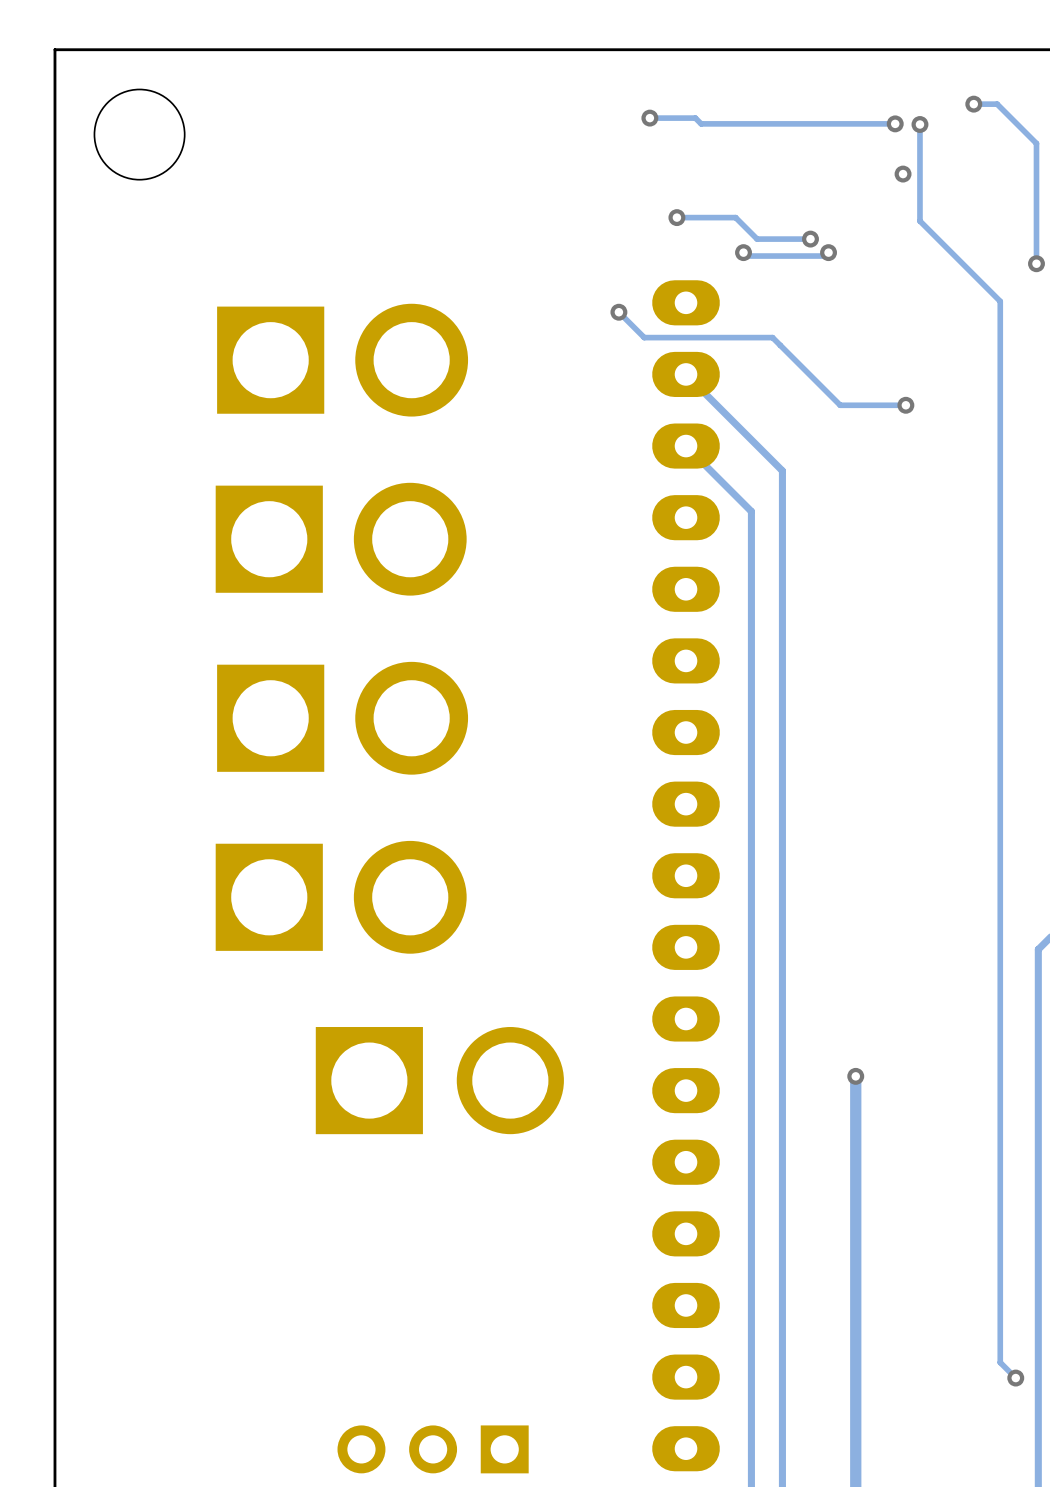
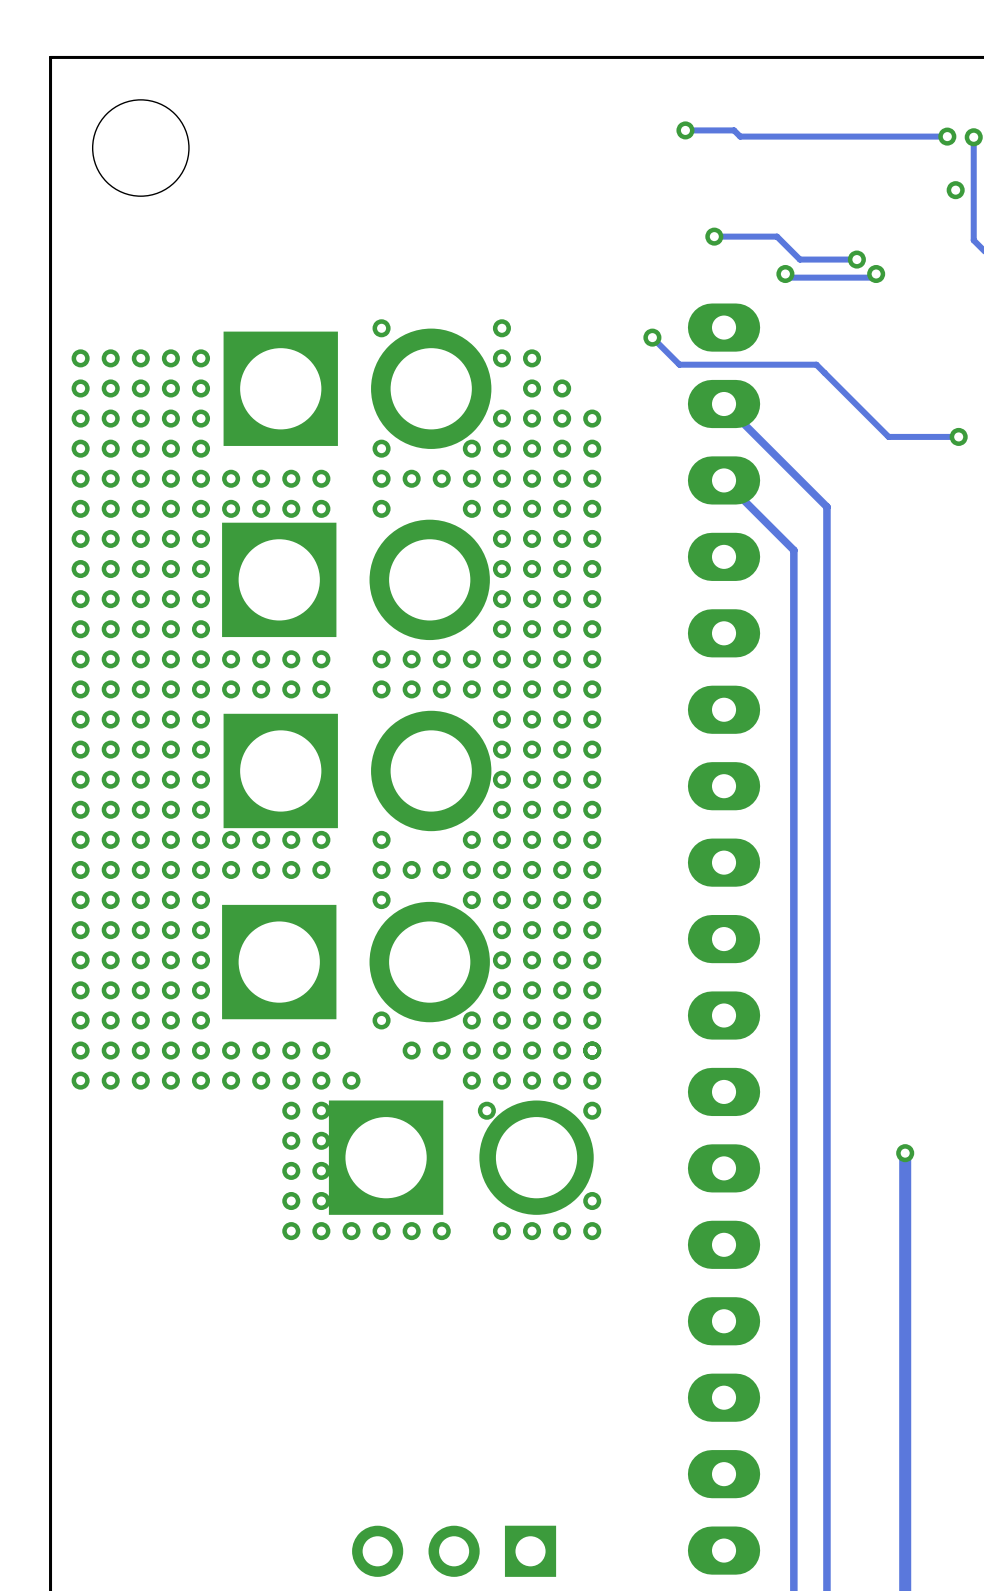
via: none -> (381, 328)
via: none -> (501, 328)
via: none -> (80, 358)
via: none -> (110, 358)
via: none -> (140, 358)
via: none -> (170, 358)
via: none -> (201, 358)
via: none -> (501, 358)
via: none -> (532, 358)
via: none -> (80, 388)
via: none -> (110, 388)
via: none -> (140, 388)
via: none -> (170, 388)
via: none -> (201, 388)
via: none -> (532, 388)
via: none -> (562, 388)
via: none -> (80, 418)
via: none -> (110, 418)
via: none -> (140, 418)
via: none -> (170, 418)
via: none -> (201, 418)
via: none -> (501, 418)
via: none -> (532, 418)
via: none -> (562, 418)
via: none -> (592, 418)
via: none -> (80, 448)
via: none -> (110, 448)
via: none -> (140, 448)
via: none -> (170, 448)
via: none -> (201, 448)
via: none -> (381, 448)
via: none -> (471, 448)
via: none -> (501, 448)
via: none -> (532, 448)
via: none -> (562, 448)
via: none -> (592, 448)
via: none -> (80, 478)
via: none -> (110, 478)
via: none -> (140, 478)
via: none -> (170, 478)
via: none -> (201, 478)
via: none -> (231, 478)
via: none -> (261, 478)
via: none -> (291, 478)
via: none -> (321, 478)
via: none -> (381, 478)
via: none -> (411, 478)
via: none -> (441, 478)
via: none -> (471, 478)
via: none -> (501, 478)
via: none -> (532, 478)
via: none -> (562, 478)
via: none -> (592, 478)
via: none -> (80, 508)
via: none -> (110, 508)
via: none -> (140, 508)
via: none -> (170, 508)
via: none -> (201, 508)
via: none -> (231, 508)
via: none -> (261, 508)
via: none -> (291, 508)
via: none -> (321, 508)
via: none -> (381, 508)
via: none -> (471, 508)
via: none -> (501, 508)
via: none -> (532, 508)
via: none -> (562, 508)
via: none -> (592, 508)
via: none -> (80, 538)
via: none -> (110, 538)
via: none -> (140, 538)
via: none -> (170, 538)
via: none -> (201, 538)
via: none -> (501, 538)
via: none -> (532, 538)
via: none -> (562, 538)
via: none -> (592, 538)
via: none -> (80, 569)
via: none -> (110, 569)
via: none -> (140, 569)
via: none -> (170, 569)
via: none -> (201, 569)
via: none -> (501, 569)
via: none -> (532, 569)
via: none -> (562, 569)
via: none -> (592, 569)
via: none -> (80, 599)
via: none -> (110, 599)
via: none -> (140, 599)
via: none -> (170, 599)
via: none -> (201, 599)
via: none -> (501, 599)
via: none -> (532, 599)
via: none -> (562, 599)
via: none -> (592, 599)
via: none -> (80, 629)
via: none -> (110, 629)
via: none -> (140, 629)
via: none -> (170, 629)
via: none -> (201, 629)
via: none -> (501, 629)
via: none -> (532, 629)
via: none -> (562, 629)
via: none -> (592, 629)
via: none -> (80, 659)
via: none -> (110, 659)
via: none -> (140, 659)
via: none -> (170, 659)
via: none -> (201, 659)
via: none -> (231, 659)
via: none -> (261, 659)
via: none -> (291, 659)
via: none -> (321, 659)
via: none -> (381, 659)
via: none -> (411, 659)
via: none -> (441, 659)
via: none -> (471, 659)
via: none -> (501, 659)
via: none -> (532, 659)
via: none -> (562, 659)
via: none -> (592, 659)
via: none -> (80, 689)
via: none -> (110, 689)
via: none -> (140, 689)
via: none -> (170, 689)
via: none -> (201, 689)
via: none -> (231, 689)
via: none -> (261, 689)
via: none -> (291, 689)
via: none -> (321, 689)
via: none -> (381, 689)
via: none -> (411, 689)
via: none -> (441, 689)
via: none -> (471, 689)
via: none -> (501, 689)
via: none -> (532, 689)
via: none -> (562, 689)
via: none -> (592, 689)
via: none -> (80, 719)
via: none -> (110, 719)
via: none -> (140, 719)
via: none -> (170, 719)
via: none -> (201, 719)
via: none -> (501, 719)
via: none -> (532, 719)
via: none -> (562, 719)
via: none -> (592, 719)
via: none -> (80, 749)
via: none -> (110, 749)
via: none -> (140, 749)
via: none -> (170, 749)
via: none -> (201, 749)
via: none -> (501, 749)
via: none -> (532, 749)
via: none -> (562, 749)
via: none -> (592, 749)
via: none -> (80, 779)
via: none -> (110, 779)
via: none -> (140, 779)
via: none -> (170, 779)
via: none -> (201, 779)
via: none -> (501, 779)
via: none -> (532, 779)
via: none -> (562, 779)
via: none -> (592, 779)
via: none -> (80, 809)
via: none -> (110, 809)
via: none -> (140, 809)
via: none -> (170, 809)
via: none -> (201, 809)
via: none -> (501, 809)
via: none -> (532, 809)
via: none -> (562, 809)
via: none -> (592, 809)
via: none -> (80, 839)
via: none -> (110, 839)
via: none -> (140, 839)
via: none -> (170, 839)
via: none -> (201, 839)
via: none -> (231, 839)
via: none -> (261, 839)
via: none -> (291, 839)
via: none -> (321, 839)
via: none -> (381, 839)
via: none -> (471, 839)
via: none -> (501, 839)
via: none -> (532, 839)
via: none -> (562, 839)
via: none -> (592, 839)
via: none -> (80, 869)
via: none -> (110, 869)
via: none -> (140, 869)
via: none -> (170, 869)
via: none -> (201, 869)
via: none -> (231, 869)
via: none -> (261, 869)
via: none -> (291, 869)
via: none -> (321, 869)
via: none -> (381, 869)
via: none -> (411, 869)
via: none -> (441, 869)
via: none -> (471, 869)
via: none -> (501, 869)
via: none -> (532, 869)
via: none -> (562, 869)
via: none -> (592, 869)
via: none -> (80, 900)
via: none -> (110, 900)
via: none -> (140, 900)
via: none -> (170, 900)
via: none -> (201, 900)
via: none -> (381, 900)
via: none -> (471, 900)
via: none -> (501, 900)
via: none -> (532, 900)
via: none -> (562, 900)
via: none -> (592, 900)
via: none -> (80, 930)
via: none -> (110, 930)
via: none -> (140, 930)
via: none -> (170, 930)
via: none -> (201, 930)
via: none -> (501, 930)
via: none -> (532, 930)
via: none -> (562, 930)
via: none -> (592, 930)
via: none -> (80, 960)
via: none -> (110, 960)
via: none -> (140, 960)
via: none -> (170, 960)
via: none -> (201, 960)
via: none -> (501, 960)
via: none -> (532, 960)
via: none -> (562, 960)
via: none -> (592, 960)
via: none -> (80, 990)
via: none -> (110, 990)
via: none -> (140, 990)
via: none -> (170, 990)
via: none -> (201, 990)
via: none -> (501, 990)
via: none -> (532, 990)
via: none -> (562, 990)
via: none -> (592, 990)
via: none -> (80, 1020)
via: none -> (110, 1020)
via: none -> (140, 1020)
via: none -> (170, 1020)
via: none -> (201, 1020)
via: none -> (381, 1020)
via: none -> (471, 1020)
via: none -> (501, 1020)
via: none -> (532, 1020)
via: none -> (562, 1020)
via: none -> (592, 1020)
via: none -> (80, 1050)
via: none -> (110, 1050)
via: none -> (140, 1050)
via: none -> (170, 1050)
via: none -> (201, 1050)
via: none -> (231, 1050)
via: none -> (261, 1050)
via: none -> (291, 1050)
via: none -> (321, 1050)
via: none -> (411, 1050)
via: none -> (441, 1050)
via: none -> (471, 1050)
via: none -> (501, 1050)
via: none -> (532, 1050)
via: none -> (562, 1050)
via: none -> (592, 1050)
via: none -> (80, 1080)
via: none -> (110, 1080)
via: none -> (140, 1080)
via: none -> (170, 1080)
via: none -> (201, 1080)
via: none -> (231, 1080)
via: none -> (261, 1080)
via: none -> (291, 1080)
via: none -> (321, 1080)
via: none -> (351, 1080)
via: none -> (471, 1080)
via: none -> (501, 1080)
via: none -> (532, 1080)
via: none -> (562, 1080)
via: none -> (592, 1080)
via: none -> (291, 1110)
via: none -> (321, 1110)
via: none -> (486, 1110)
via: none -> (592, 1110)
via: none -> (291, 1140)
via: none -> (321, 1140)
via: none -> (291, 1170)
via: none -> (321, 1170)
via: none -> (291, 1201)
via: none -> (321, 1201)
via: none -> (592, 1201)
via: none -> (291, 1231)
via: none -> (321, 1231)
via: none -> (351, 1231)
via: none -> (381, 1231)
via: none -> (411, 1231)
via: none -> (441, 1231)
via: none -> (501, 1231)
via: none -> (532, 1231)
via: none -> (562, 1231)
via: none -> (592, 1231)

